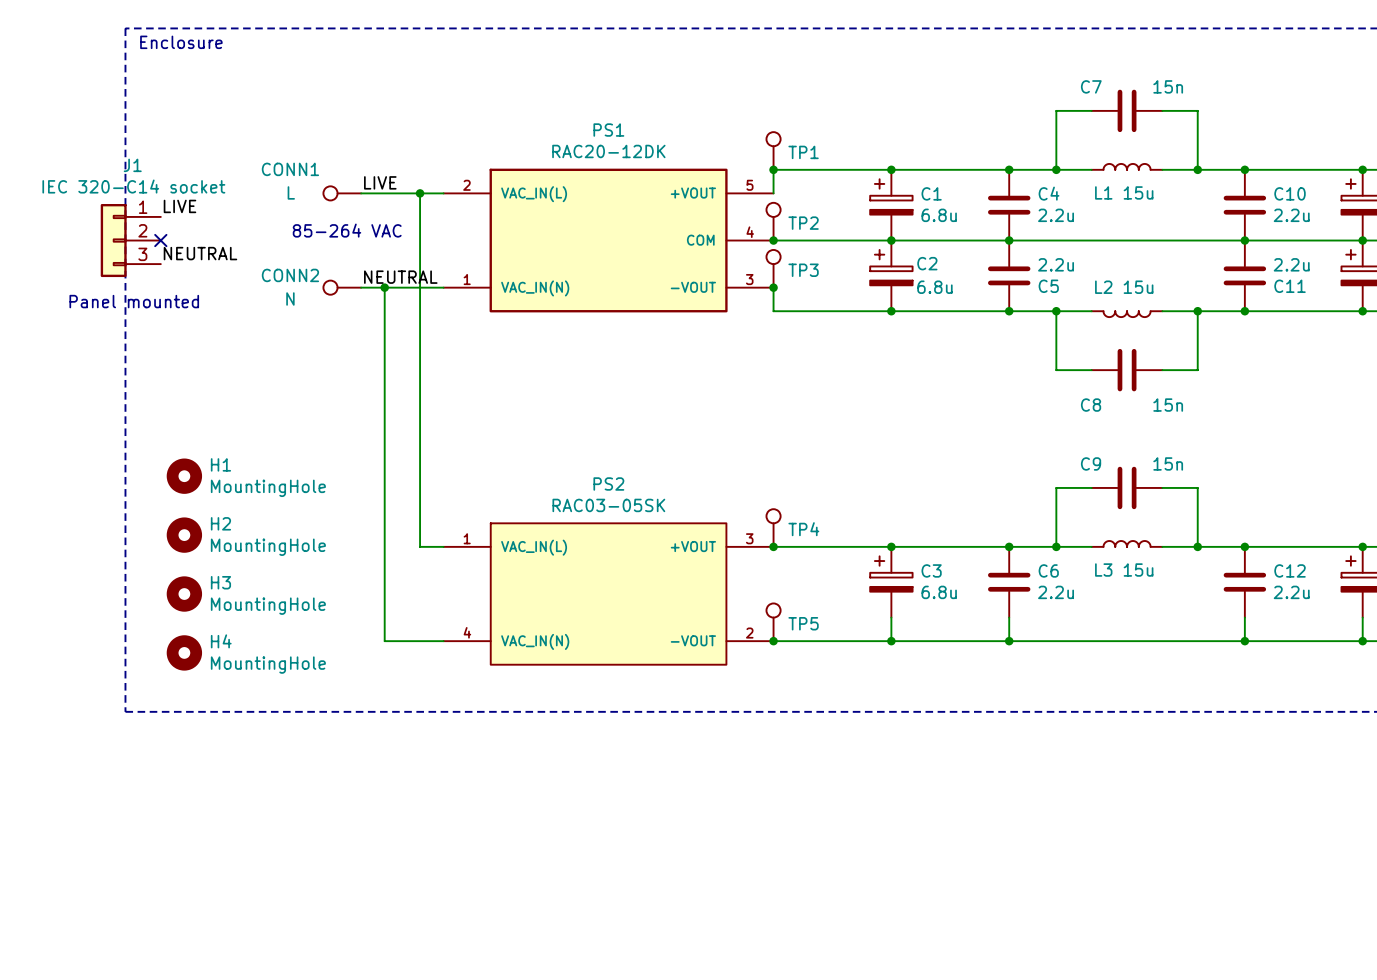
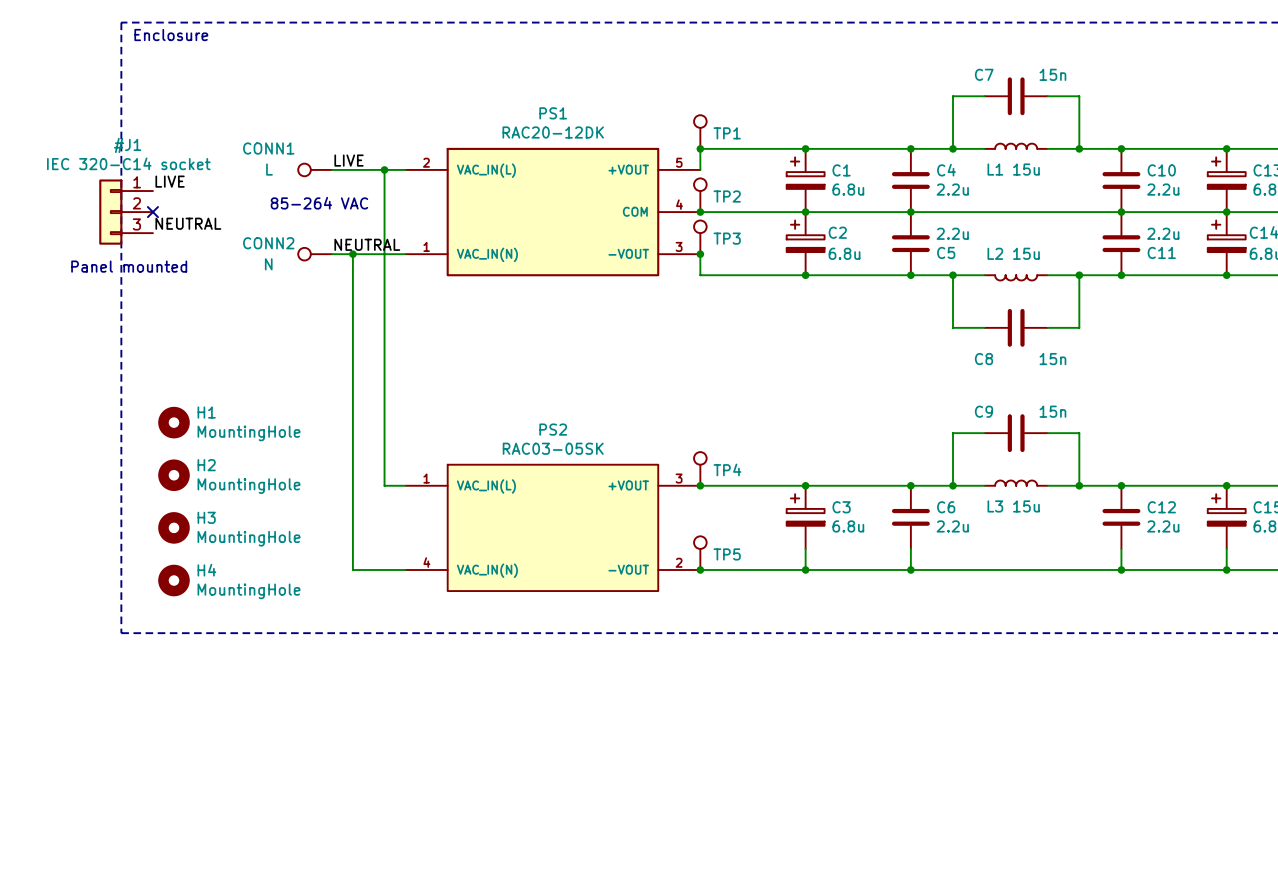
J1: IEC 320-C14 socket (130, 240) -> none
#J1: none -> IEC 320-C14 socket (126, 212)

